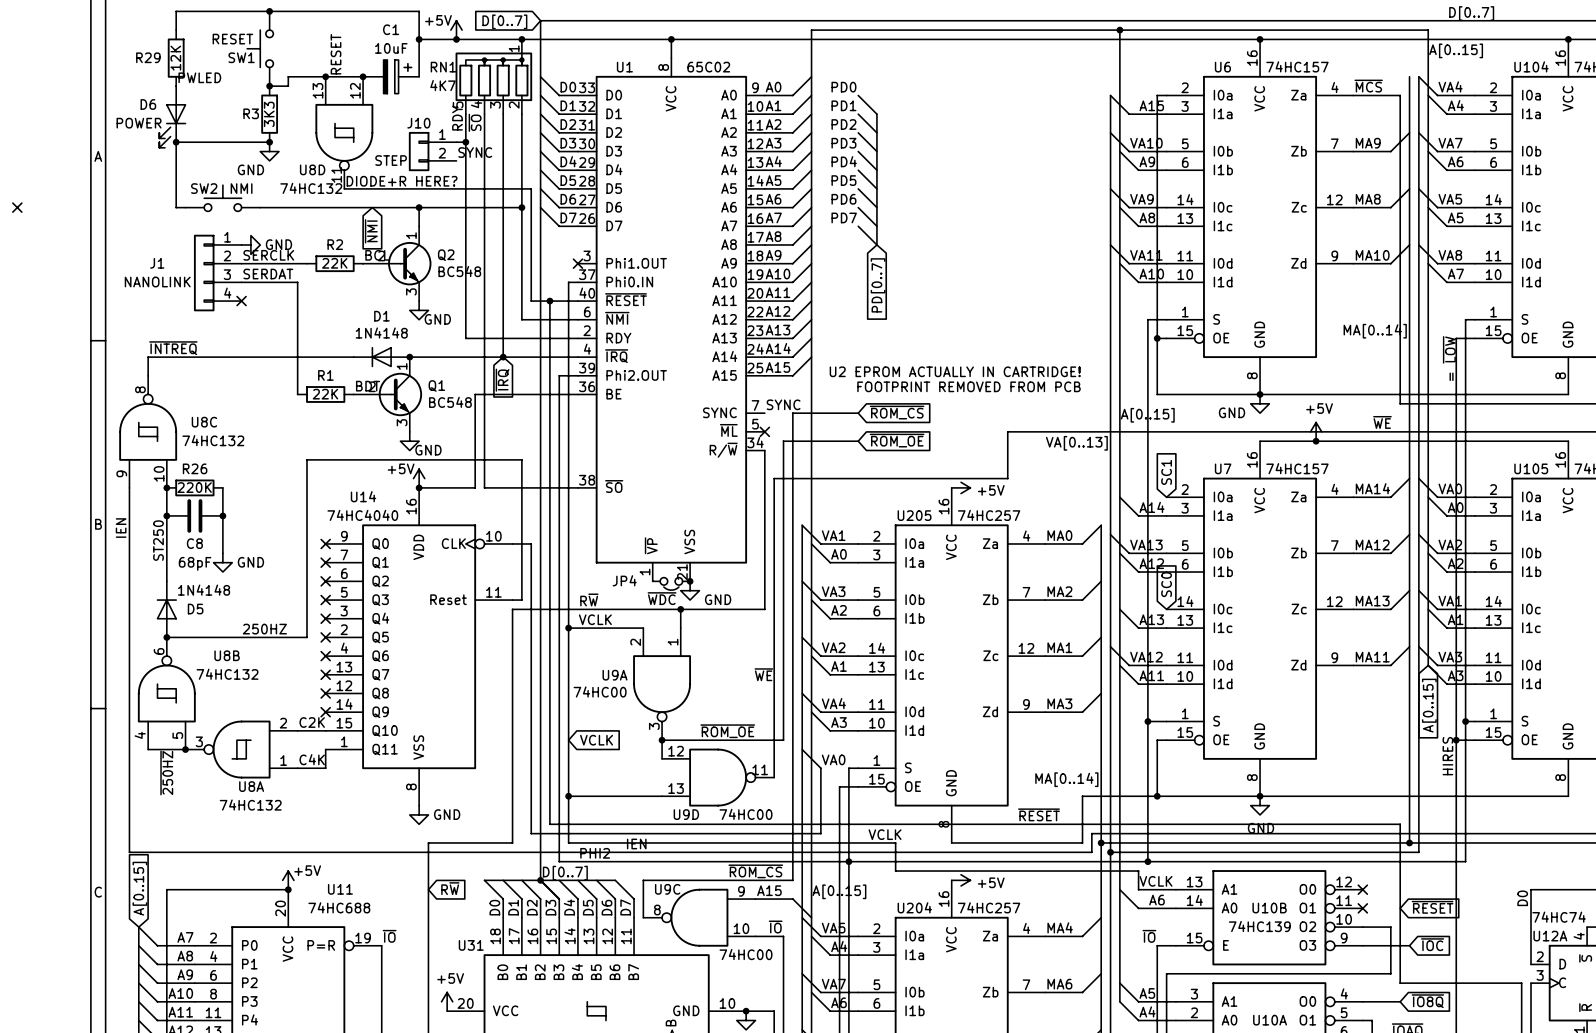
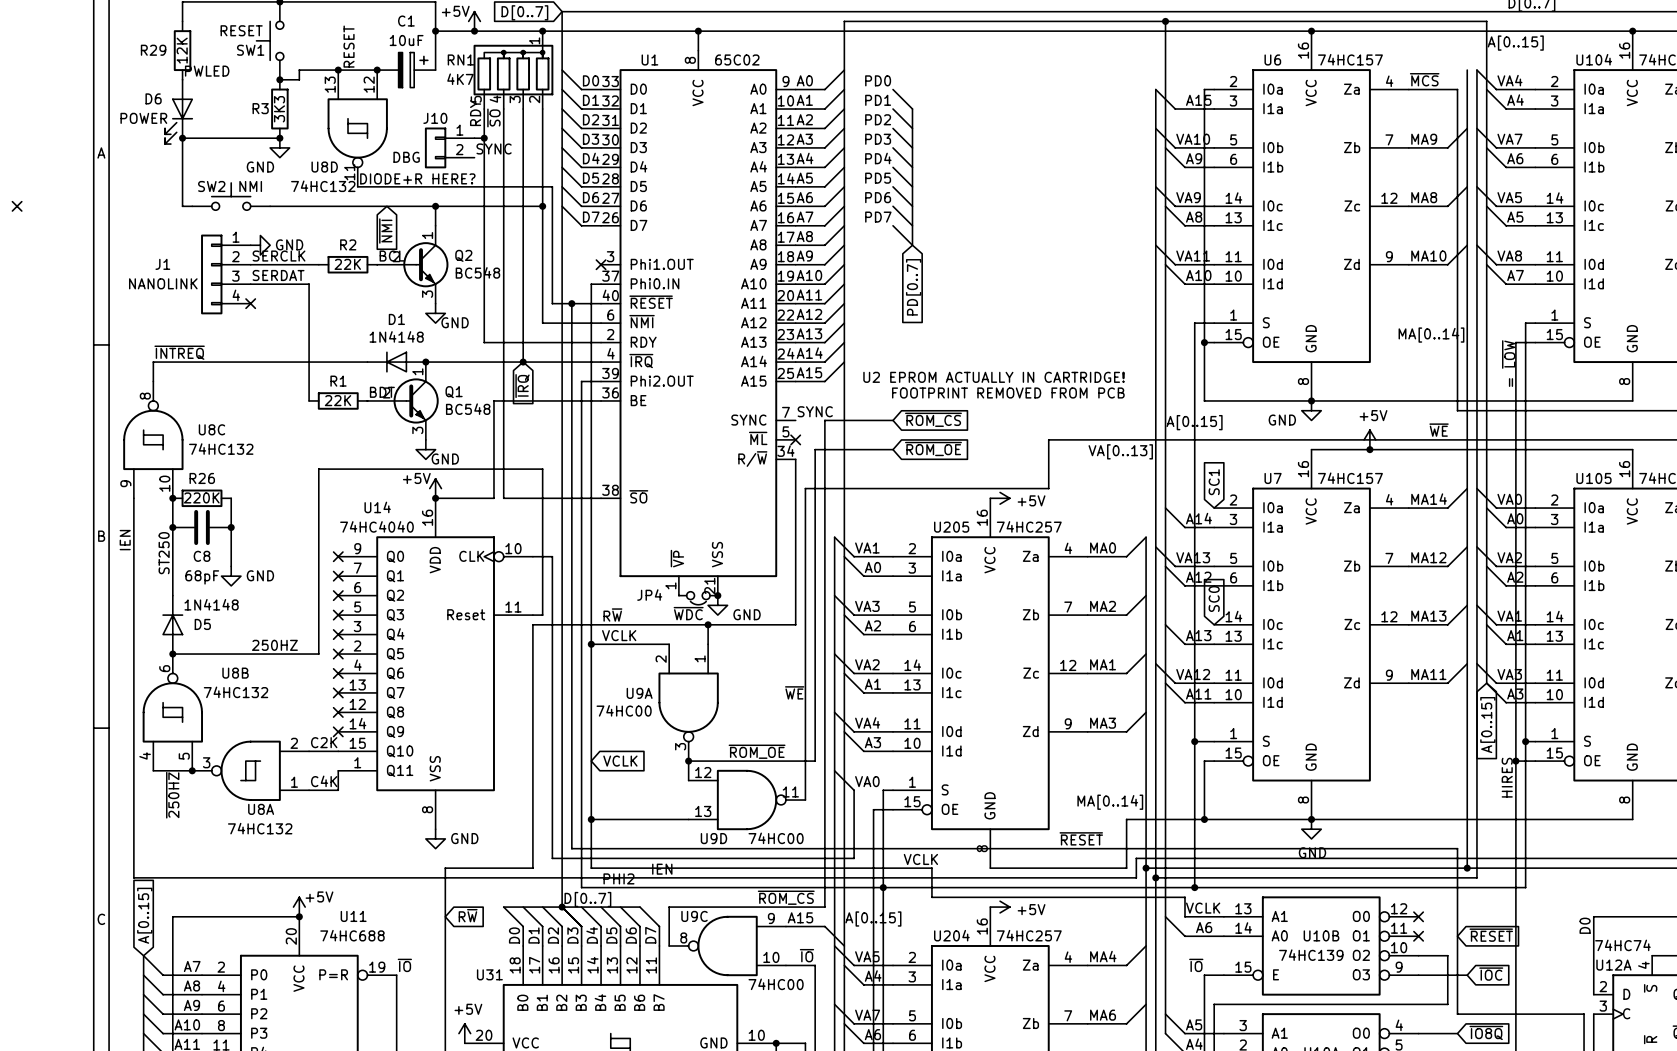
J10 value: STEP (391, 160) -> DBG (406, 157)

